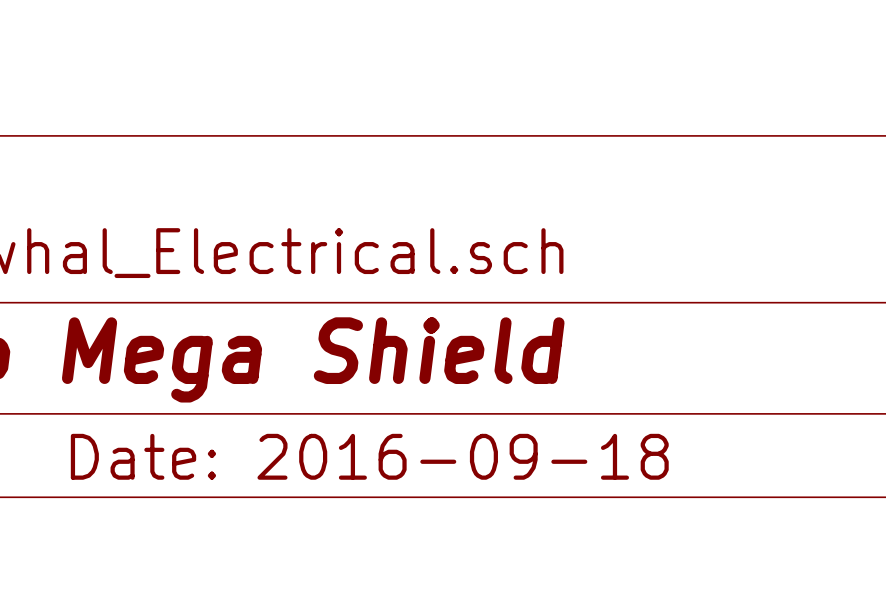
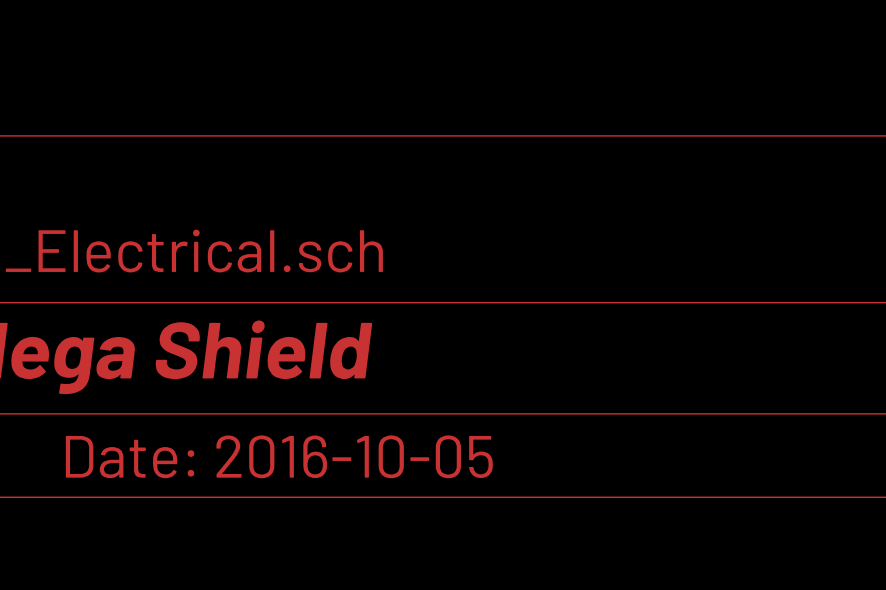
title block: Date: 2016-09-18 (369, 456) -> Date: 2016-10-05 (279, 456)

